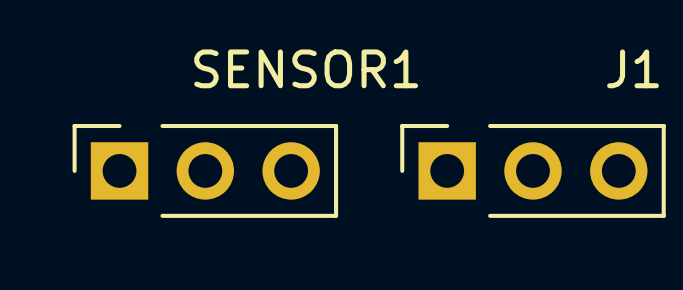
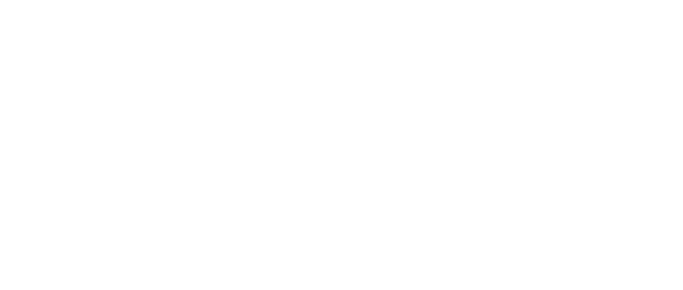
SENSOR1: (205, 170) -> none
J1: (532, 170) -> none

